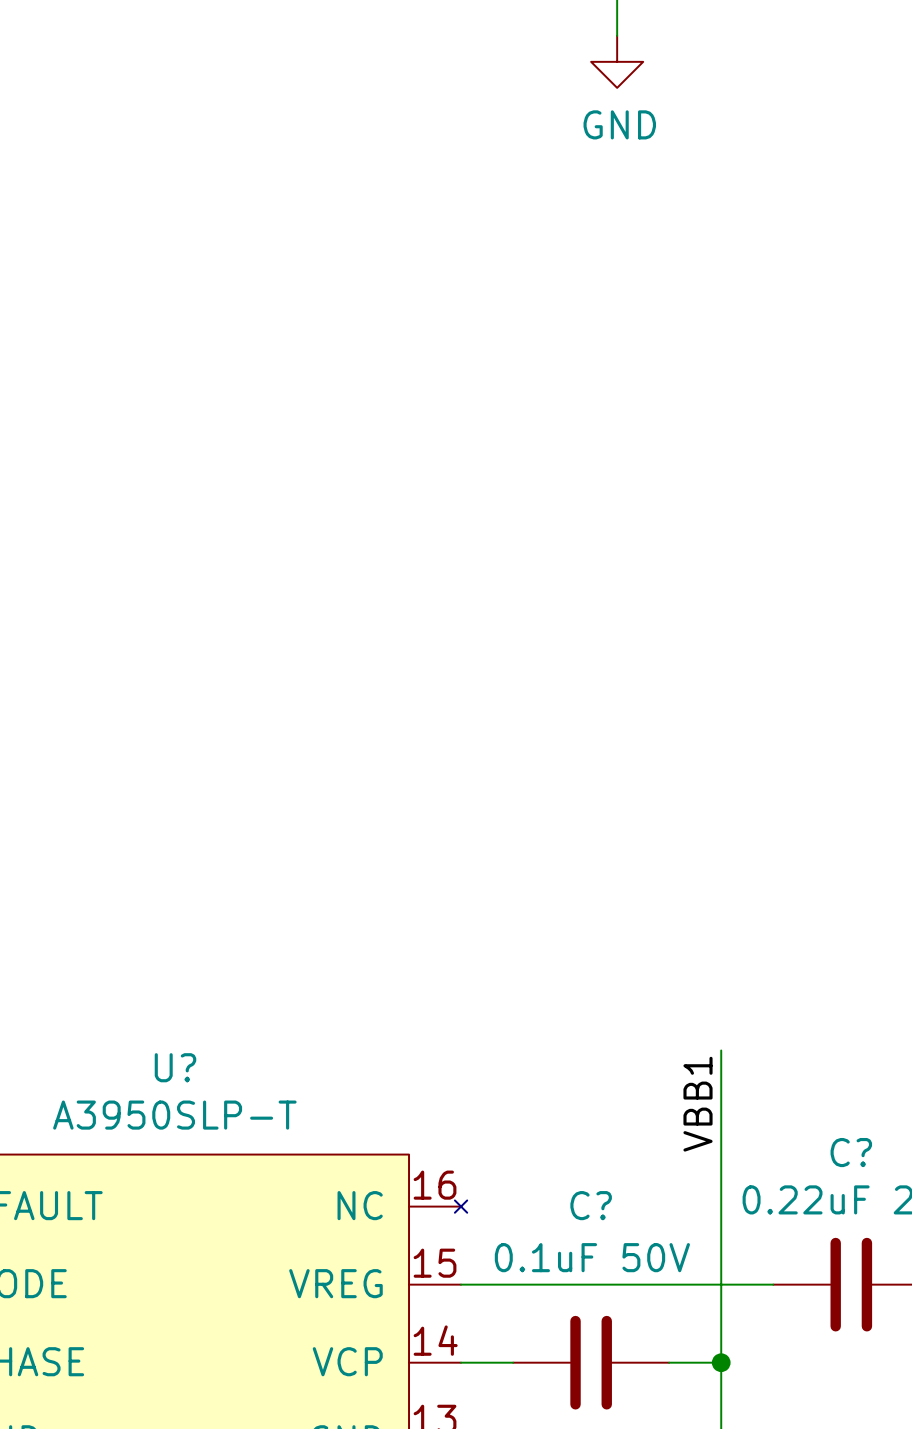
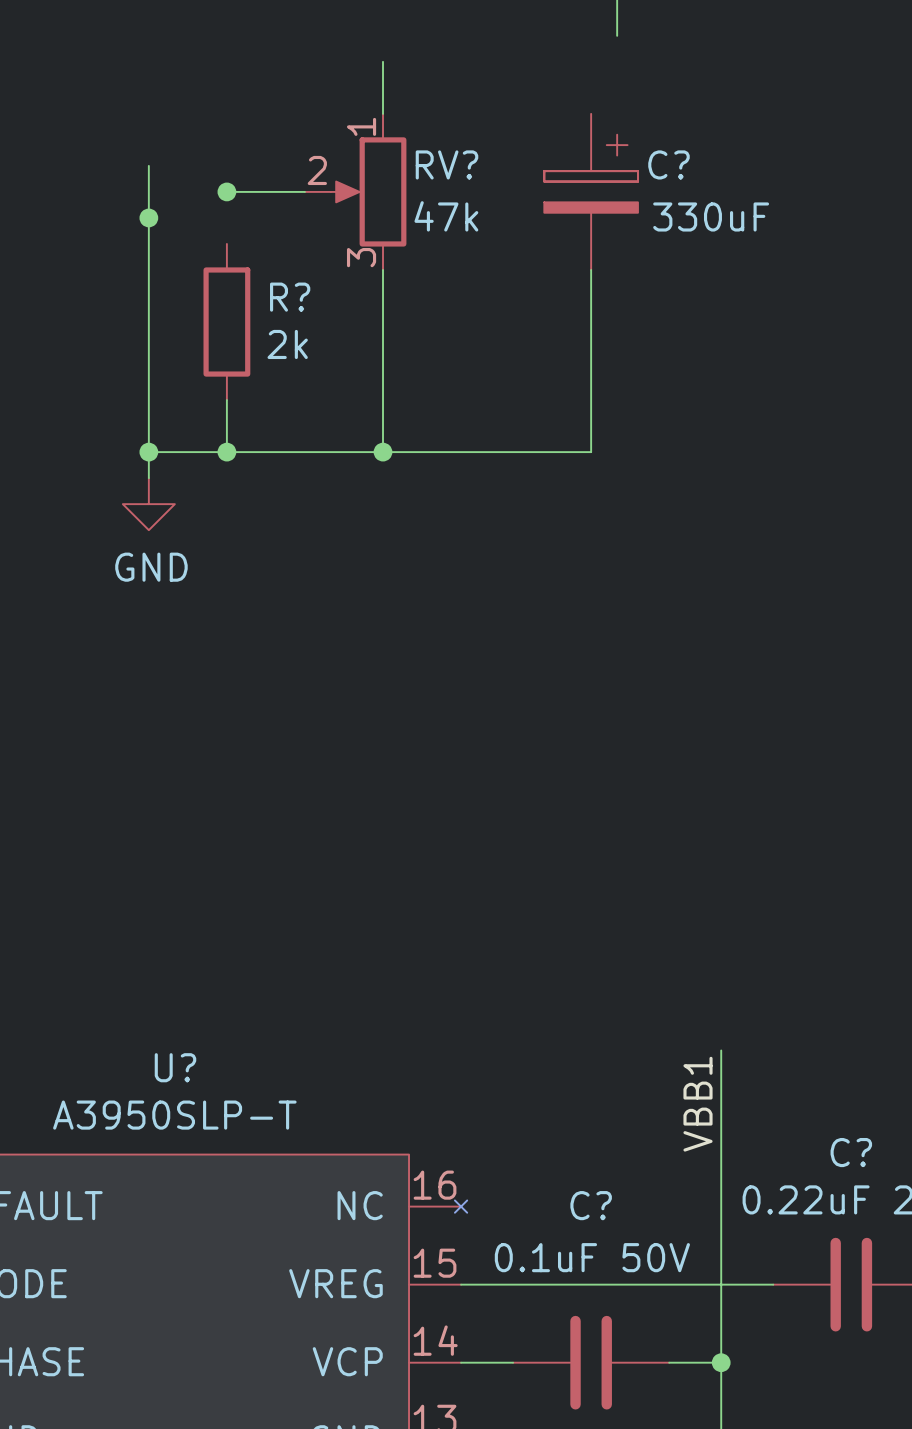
wire: none -> (383, 61) (383, 113)
power symbol: GND (617, 61) -> none
wire: none -> (148, 165) (148, 478)
wire: none -> (226, 191) (304, 191)
junction: none -> (226, 191)
RV?: none -> 47k (355, 191)
C?: none -> 330uF (591, 191)
junction: none -> (148, 217)
wire: none -> (383, 269) (383, 452)
wire: none -> (591, 269) (591, 452) (148, 452)
R?: none -> 2k (226, 322)
wire: none -> (226, 400) (226, 452)
junction: none -> (148, 452)
junction: none -> (226, 452)
junction: none -> (383, 452)
power symbol: none -> GND (148, 504)

